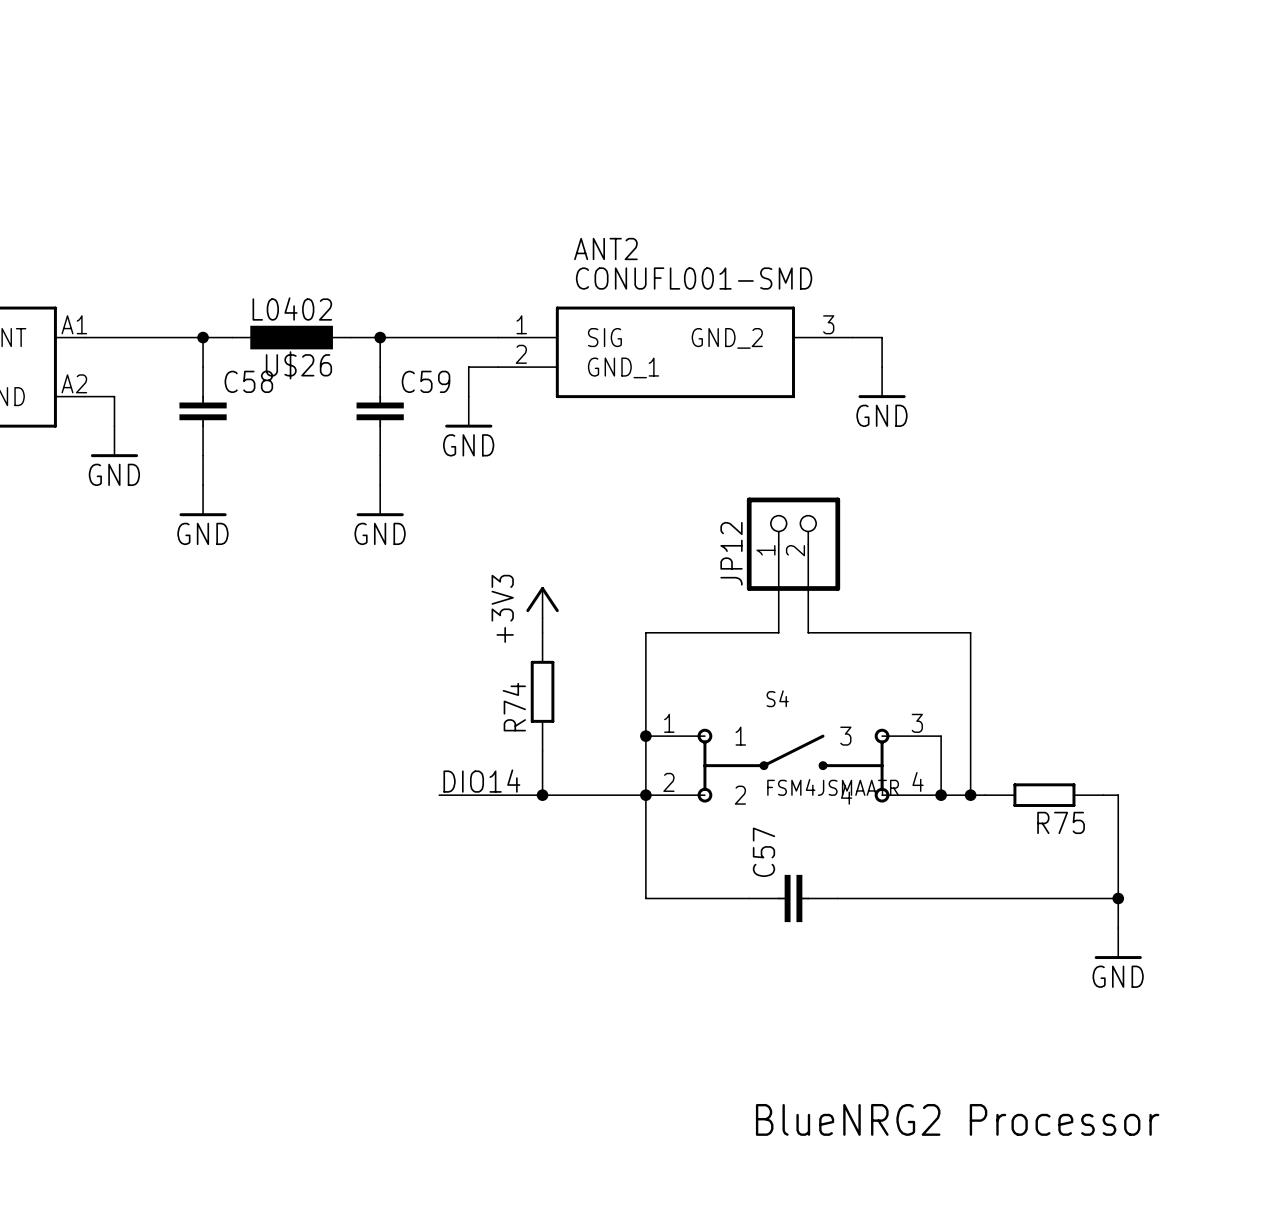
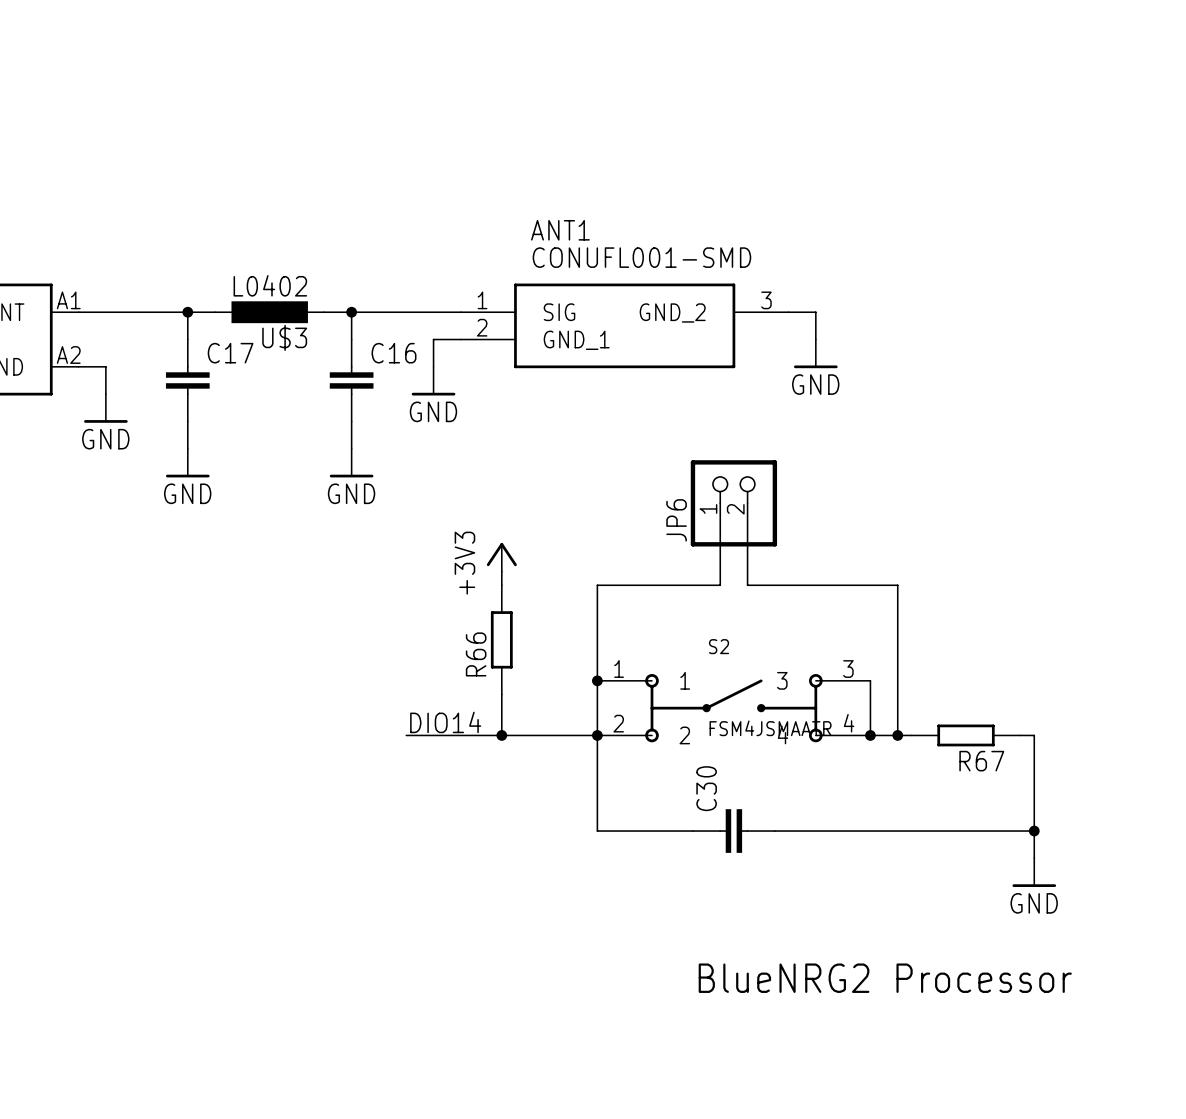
ANT2 name: ANT2 (605, 249) -> ANT1 (560, 230)
U$26 name: U$26 (298, 365) -> U$3 (284, 337)
C58 name: C58 (248, 381) -> C17 (230, 353)
C59 name: C59 (426, 381) -> C16 (394, 353)
JP12 name: JP12 (731, 553) -> JP6 (676, 520)
S4 name: S4 (777, 698) -> S2 (719, 646)
R74 name: R74 (514, 707) -> R66 (476, 654)
R75 name: R75 (1061, 822) -> R67 (981, 761)
C57 name: C57 (763, 852) -> C30 (706, 788)
text position: BlueNRG2 Processor (957, 1119) -> BlueNRG2 Processor (885, 978)

